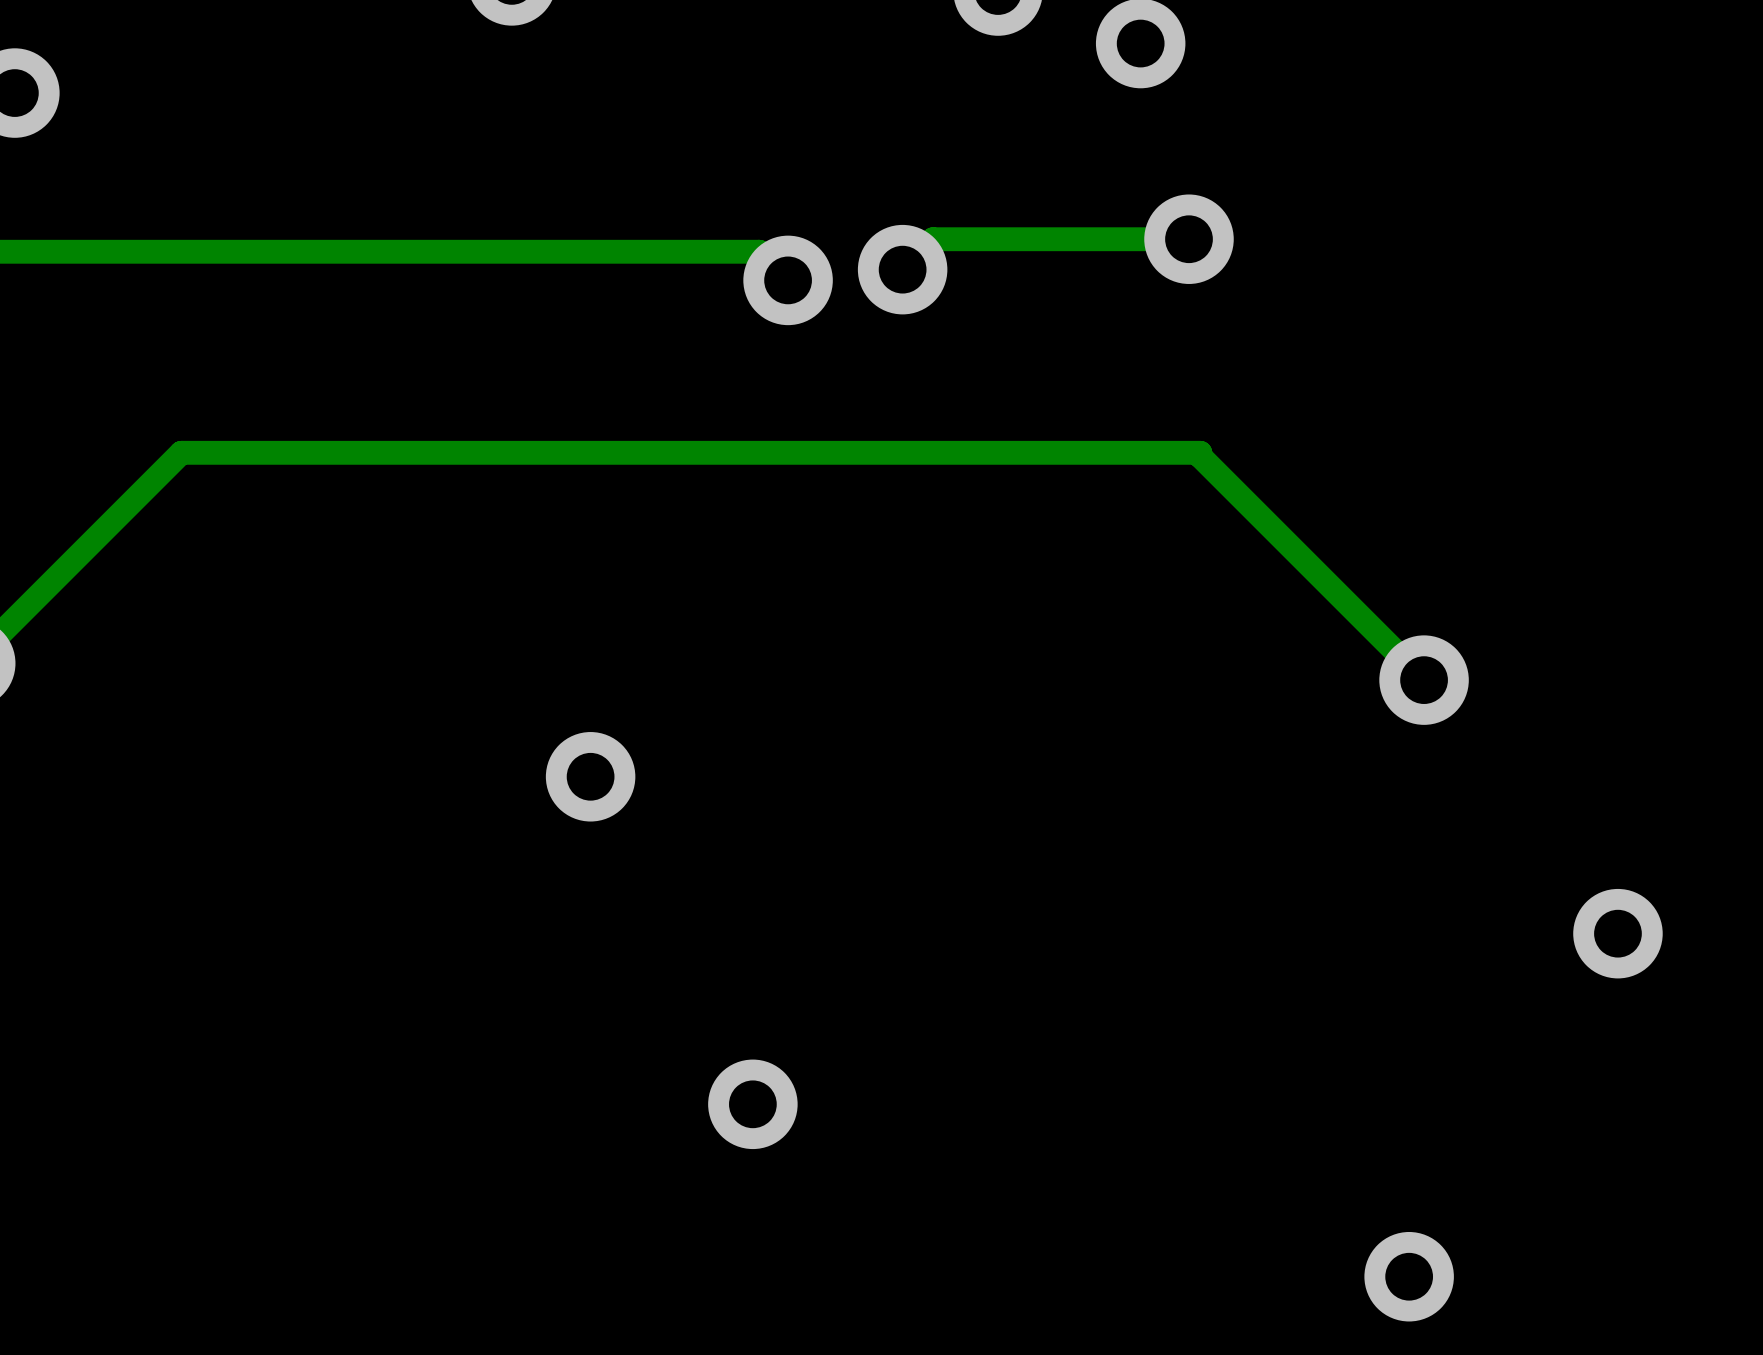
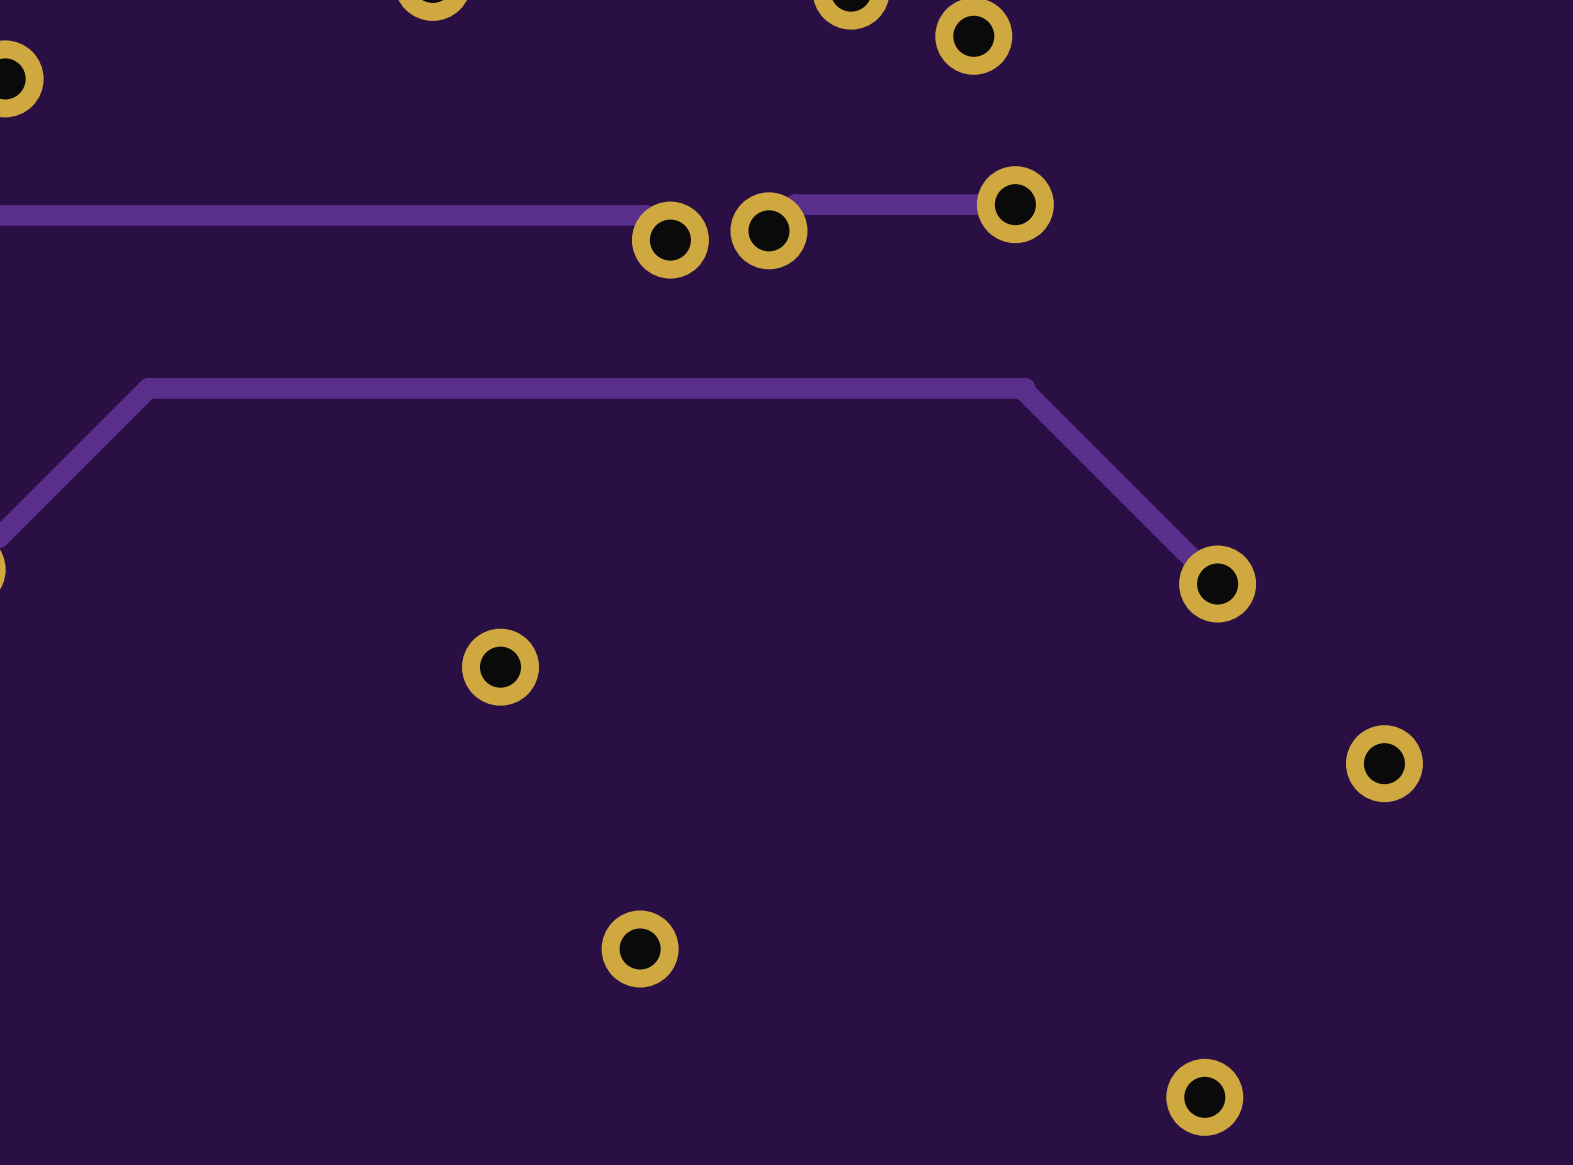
via position: (1617, 933) -> (1384, 763)

